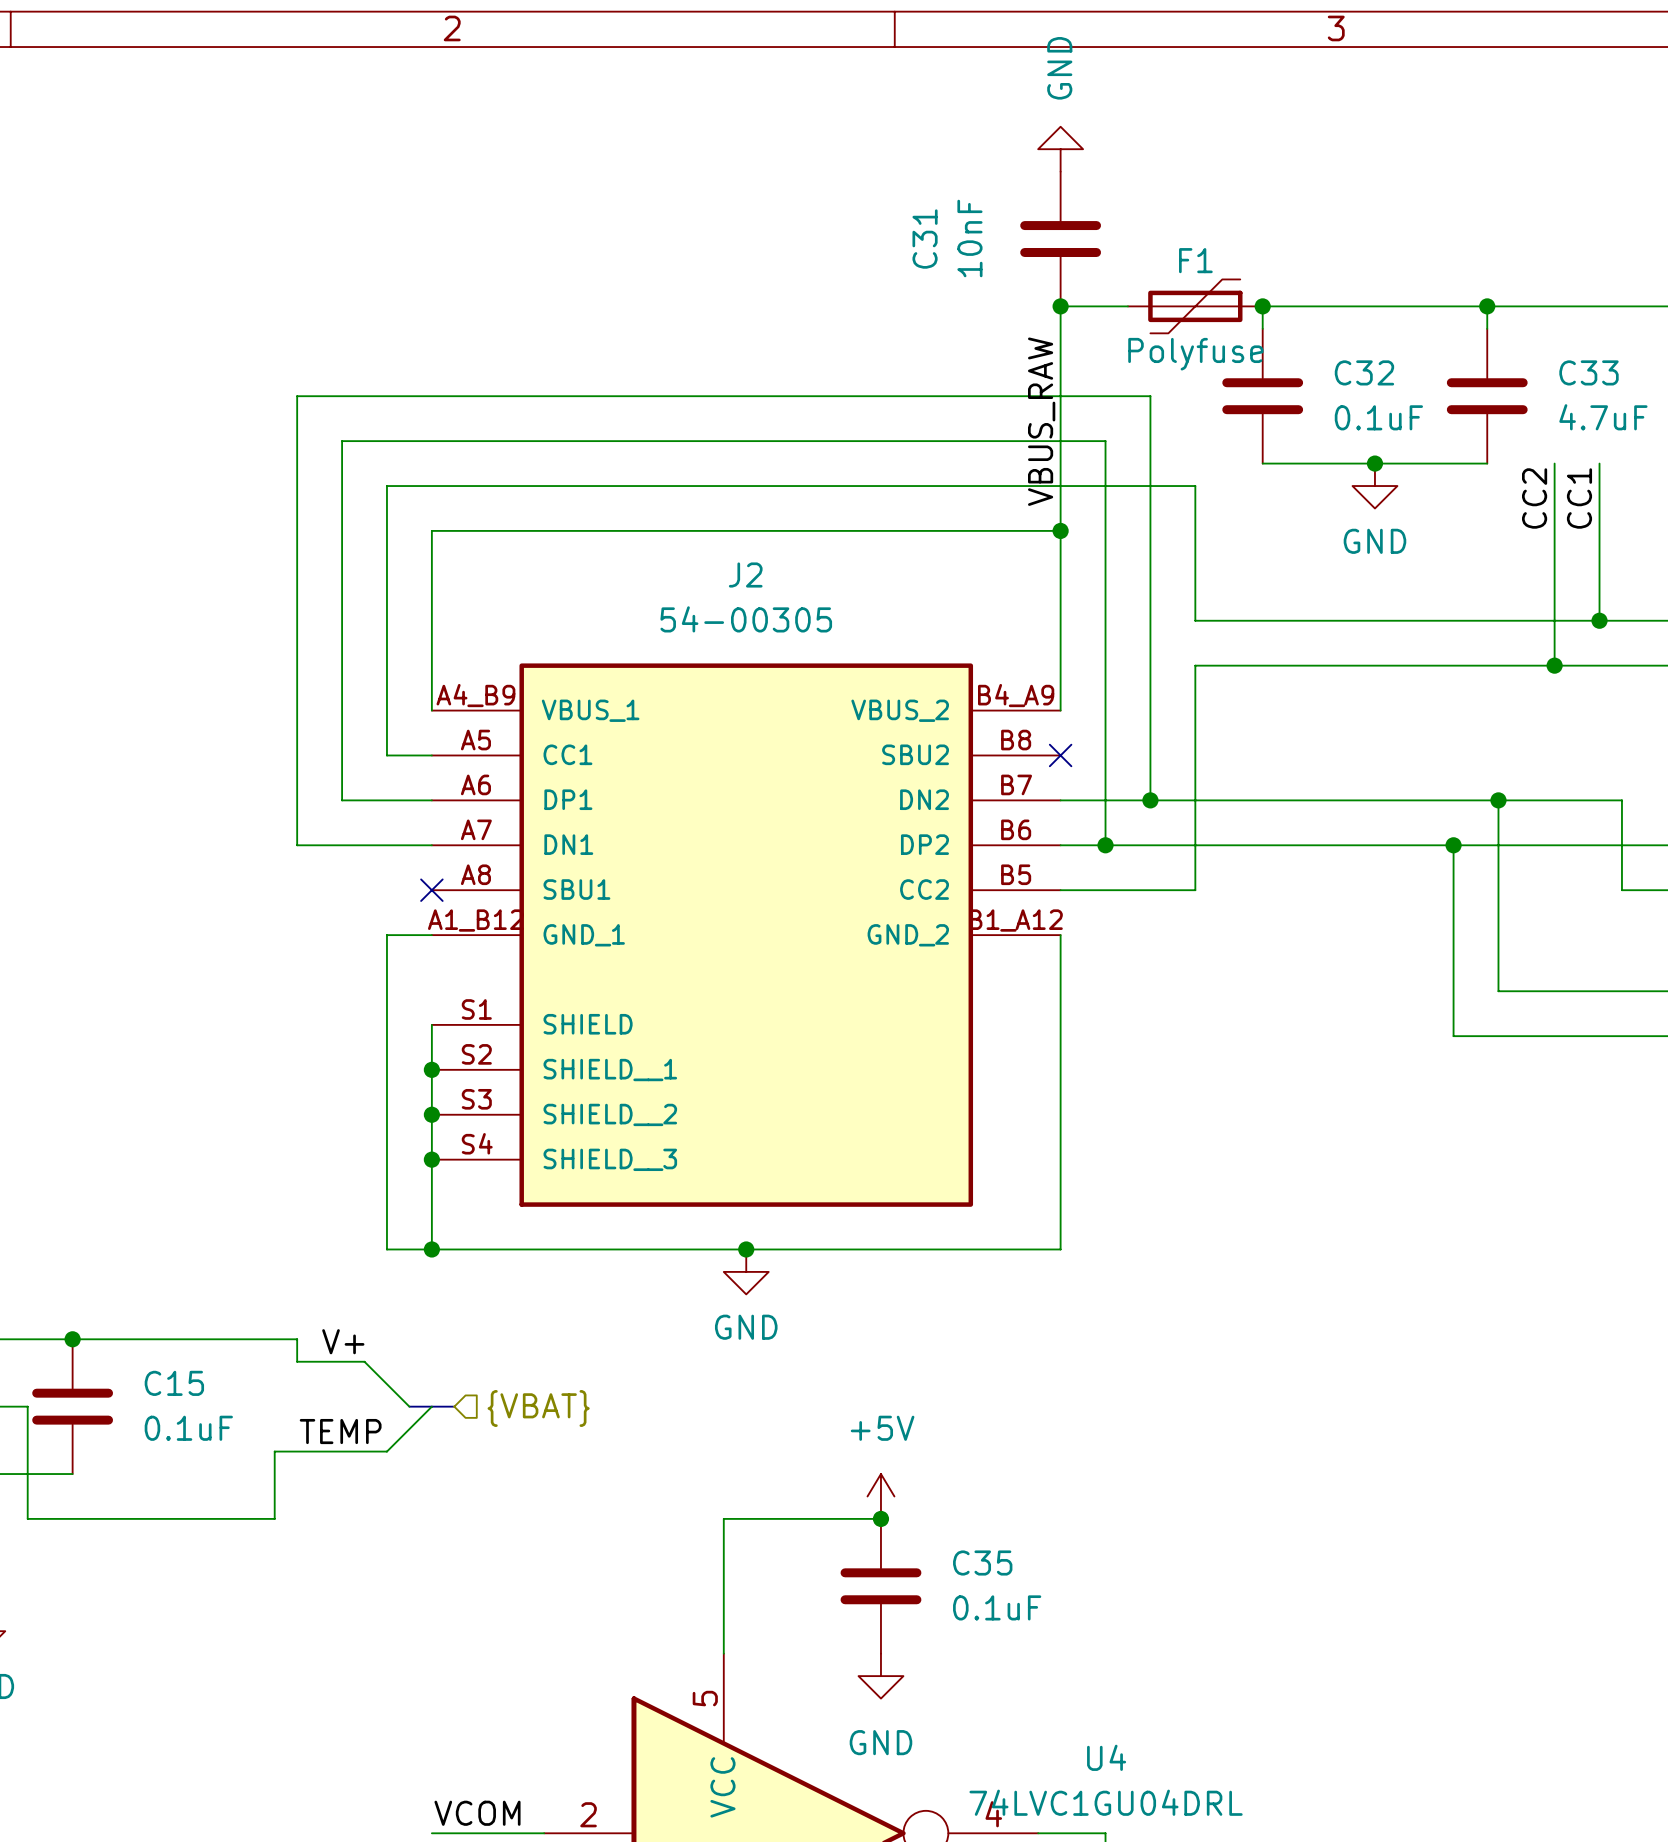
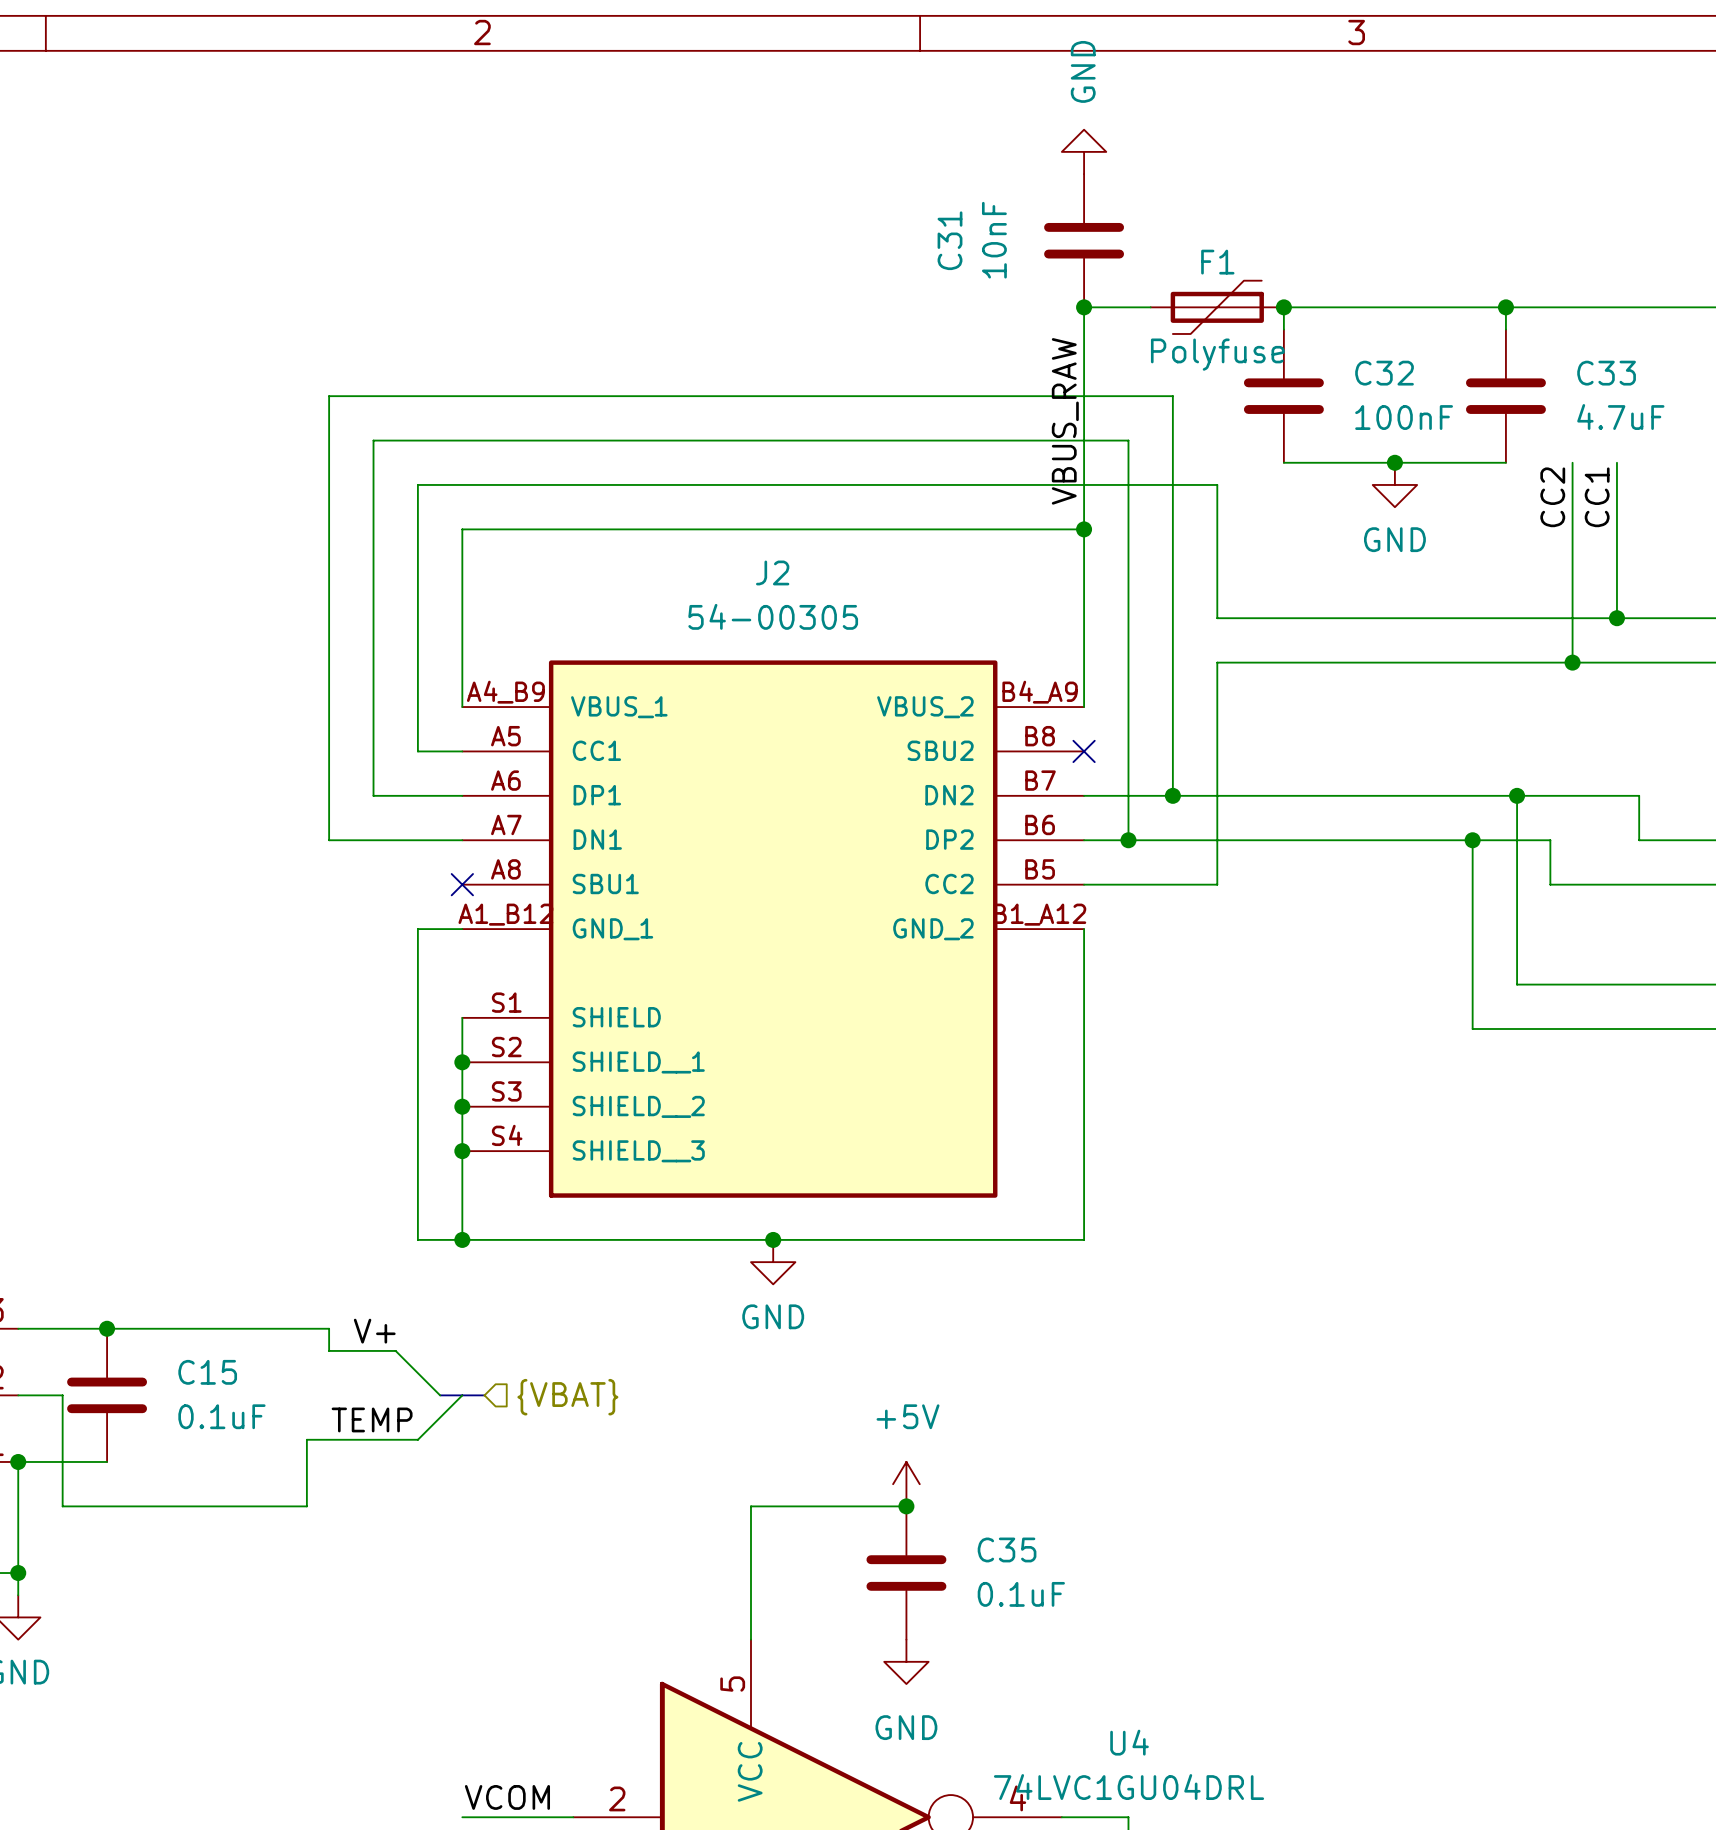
C32 value: 0.1uF (1378, 417) -> 100nF (1404, 417)
wire: (1532, 845) (1621, 845) (1621, 890) -> (1550, 840) (1550, 884) (1639, 884)

